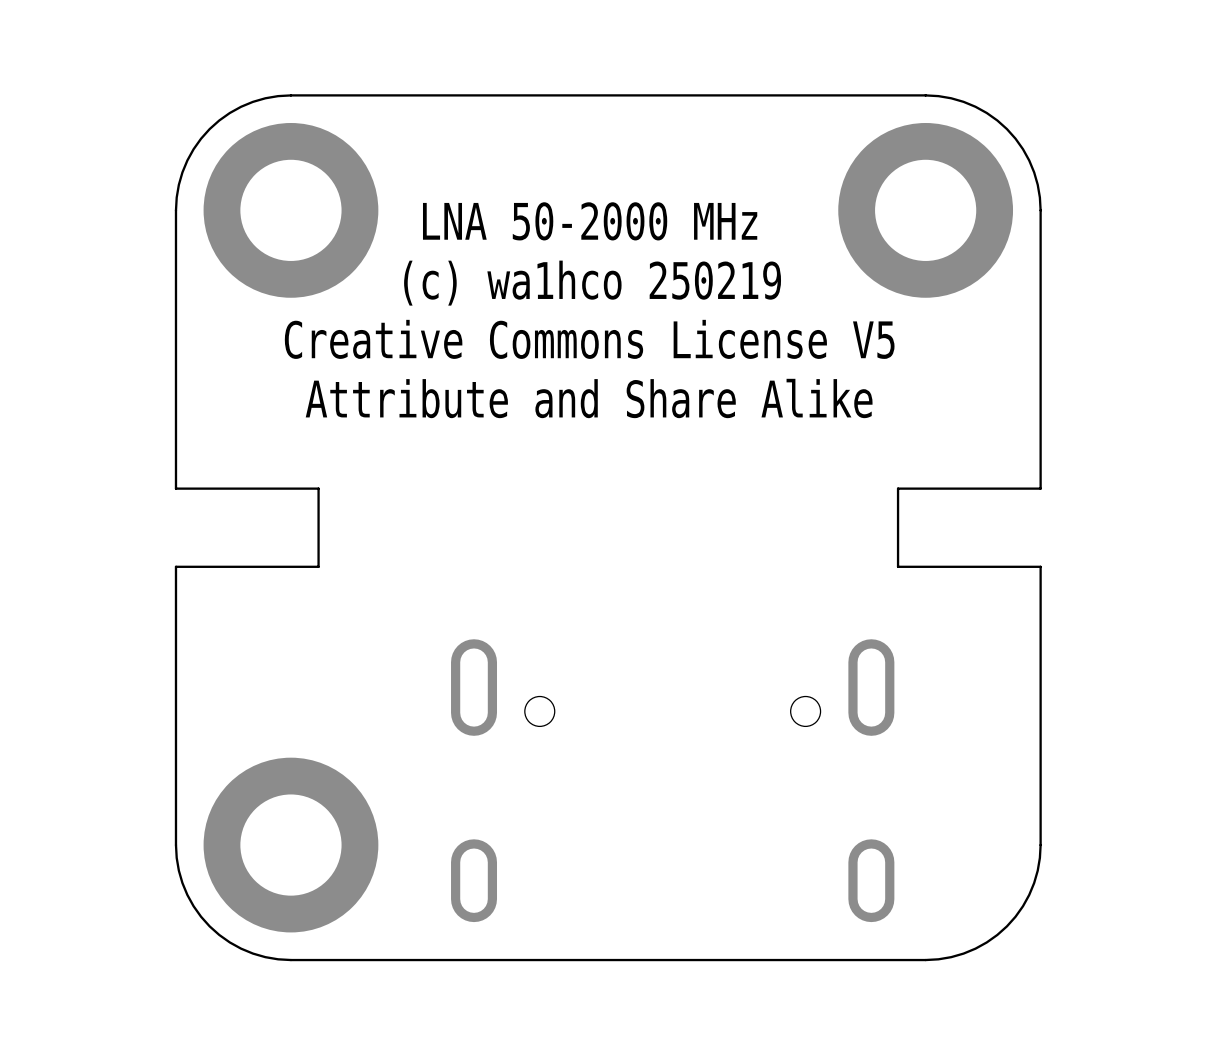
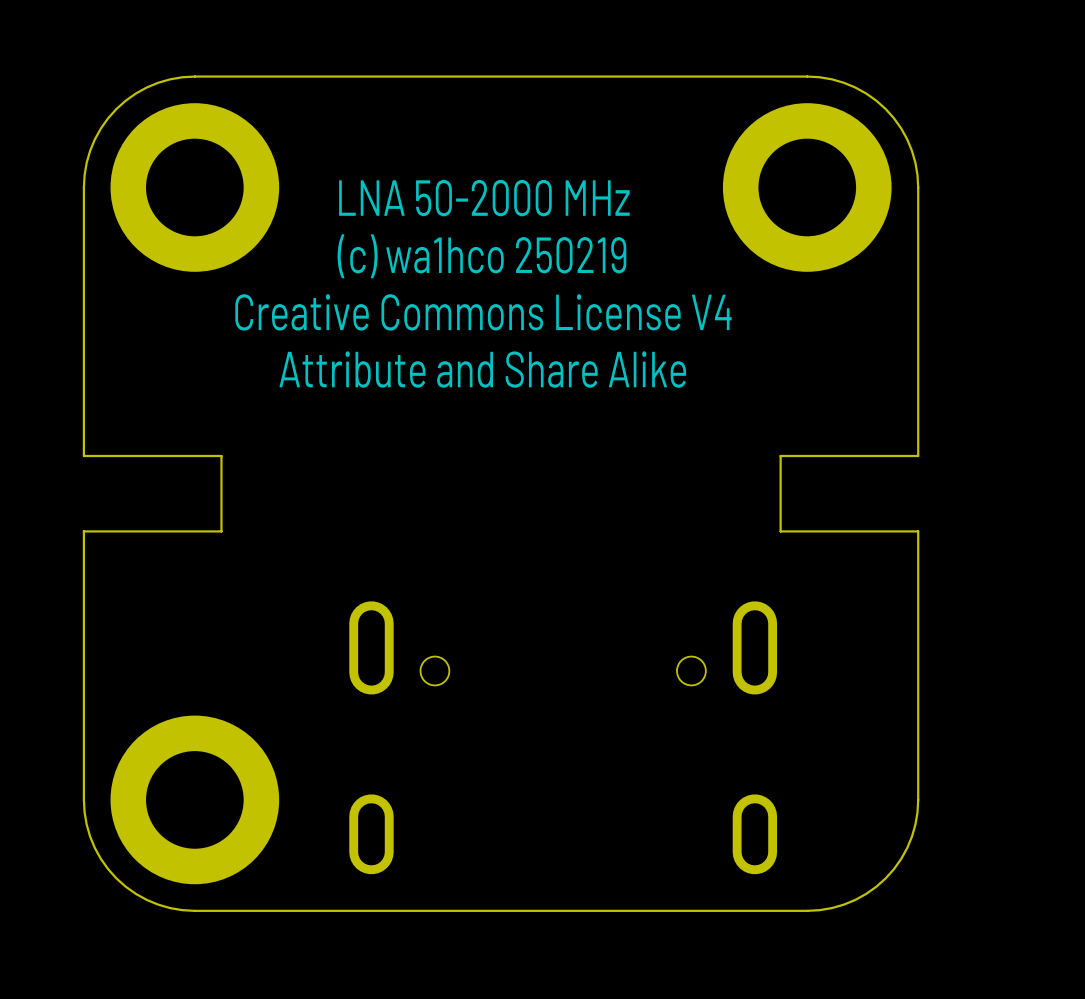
text: Creative Commons License V5 (589, 339) -> Creative Commons License V4 (483, 312)

